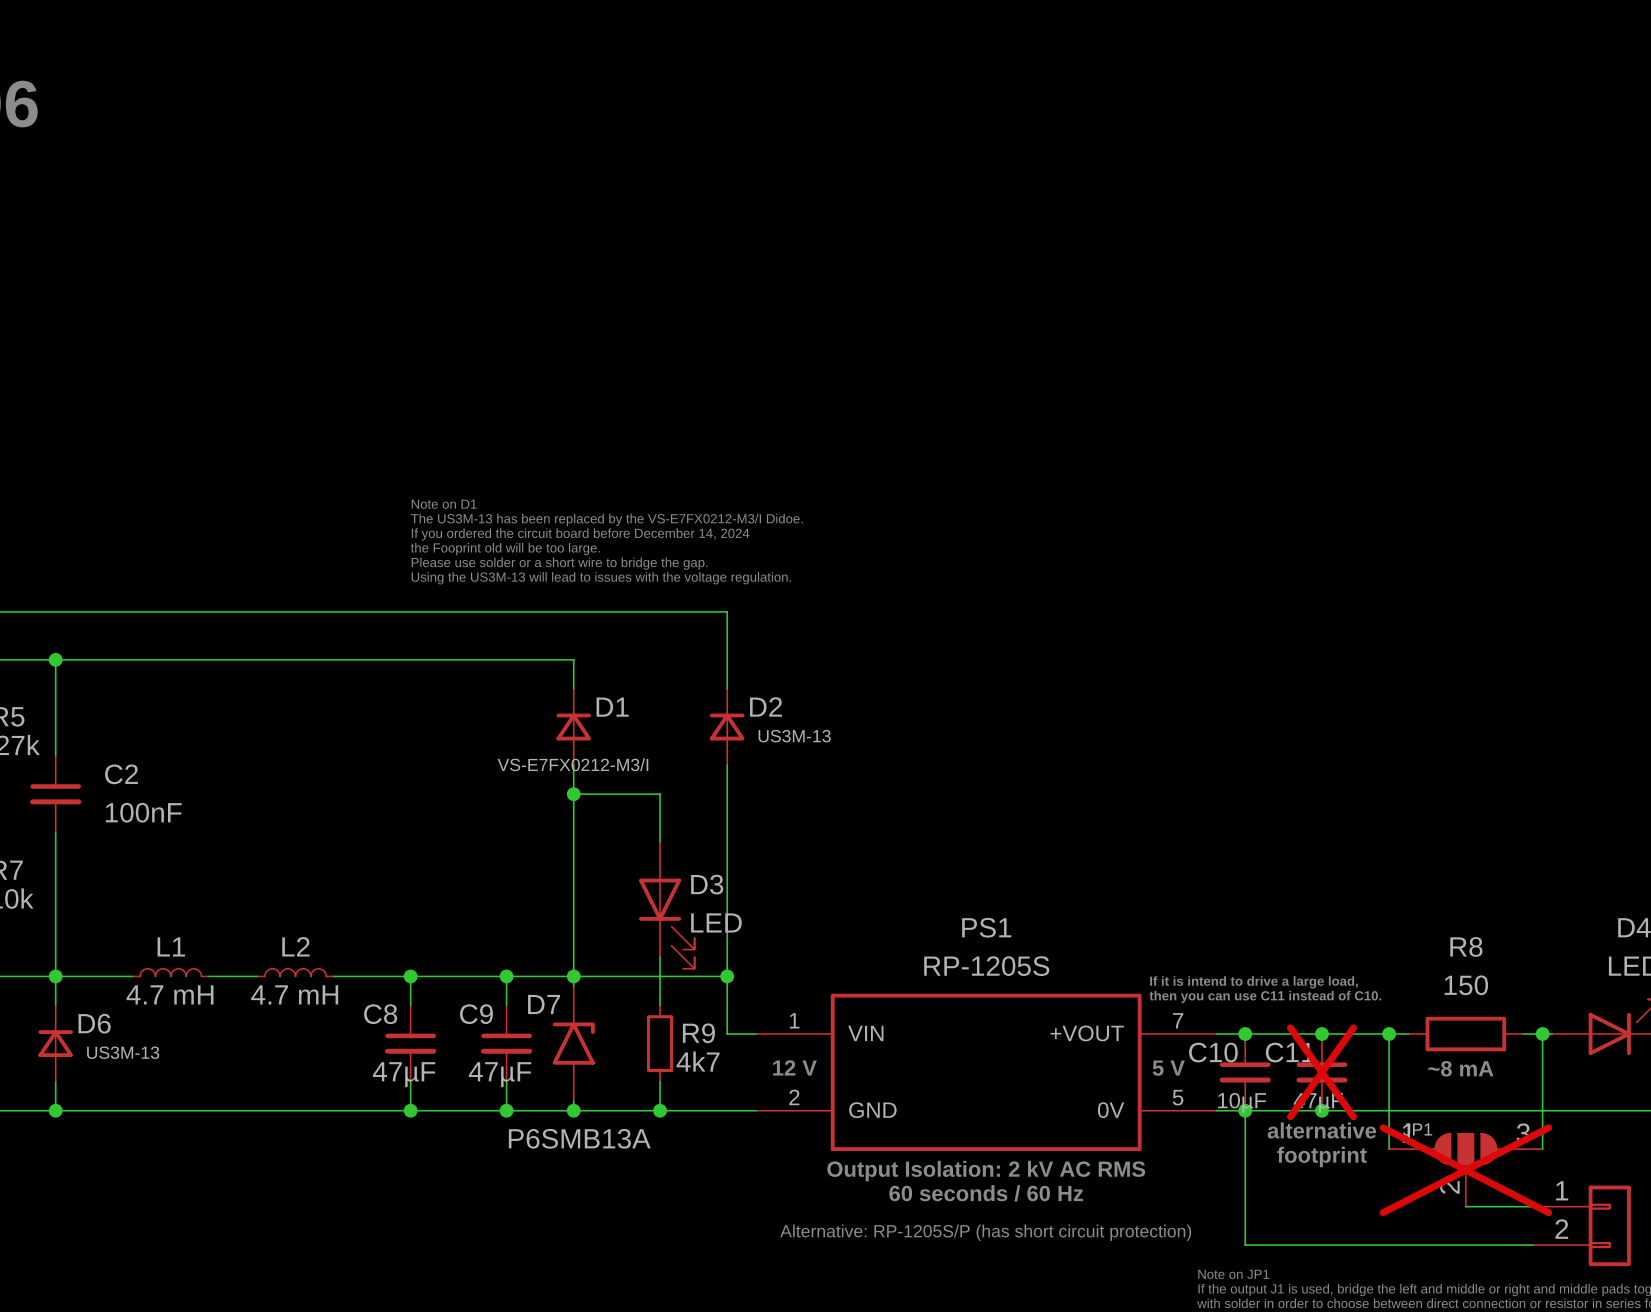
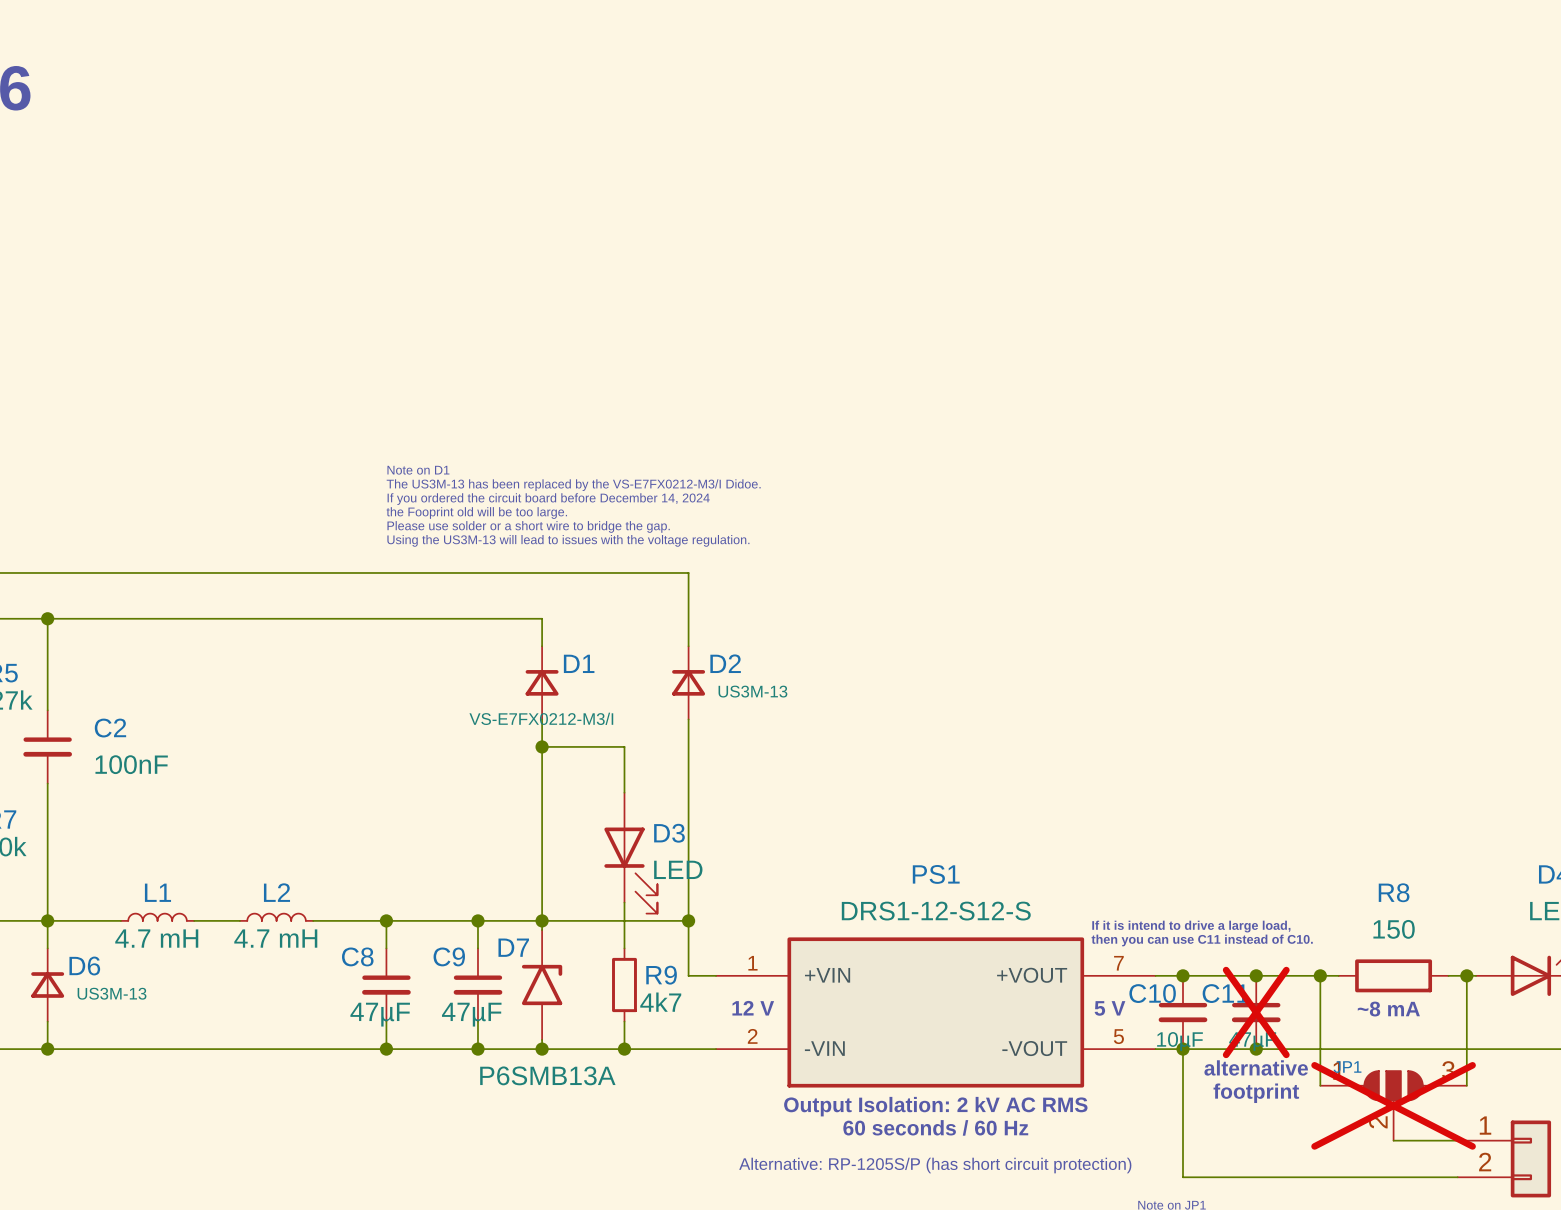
PS1 value: RP-1205S (986, 966) -> DRS1-12-S12-S (936, 911)
PS1 pin name: VIN (865, 1033) -> +VIN (827, 975)
PS1 pin name: GND (872, 1110) -> -VIN (824, 1048)
PS1 pin name: 0V (1111, 1110) -> -VOUT (1034, 1048)

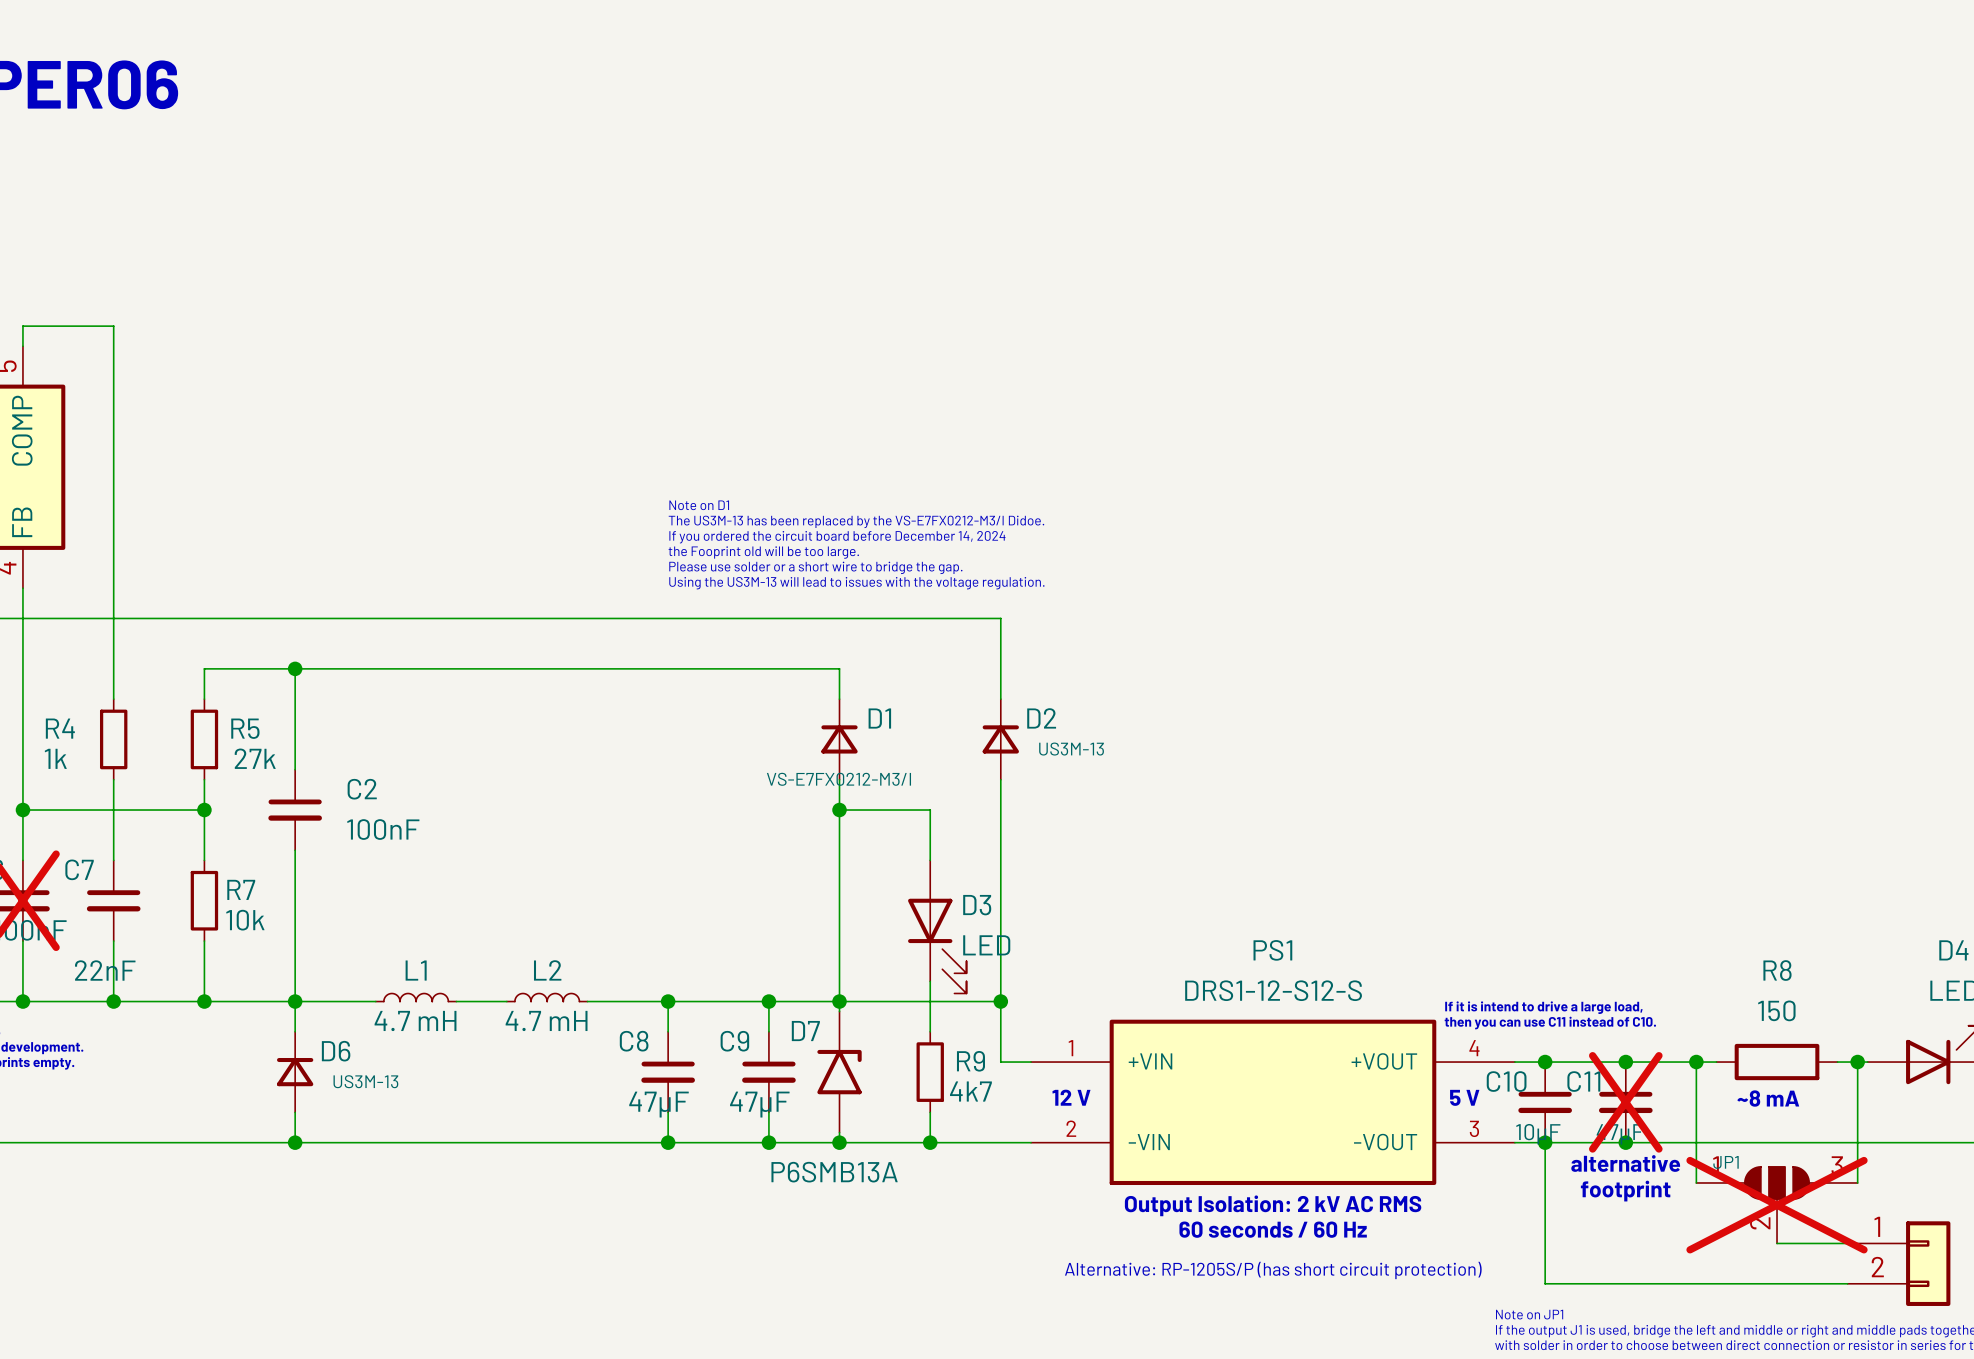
PS1 pin number: 7 (1118, 963) -> 4 (1474, 1048)
PS1 pin number: 5 (1118, 1036) -> 3 (1474, 1128)

